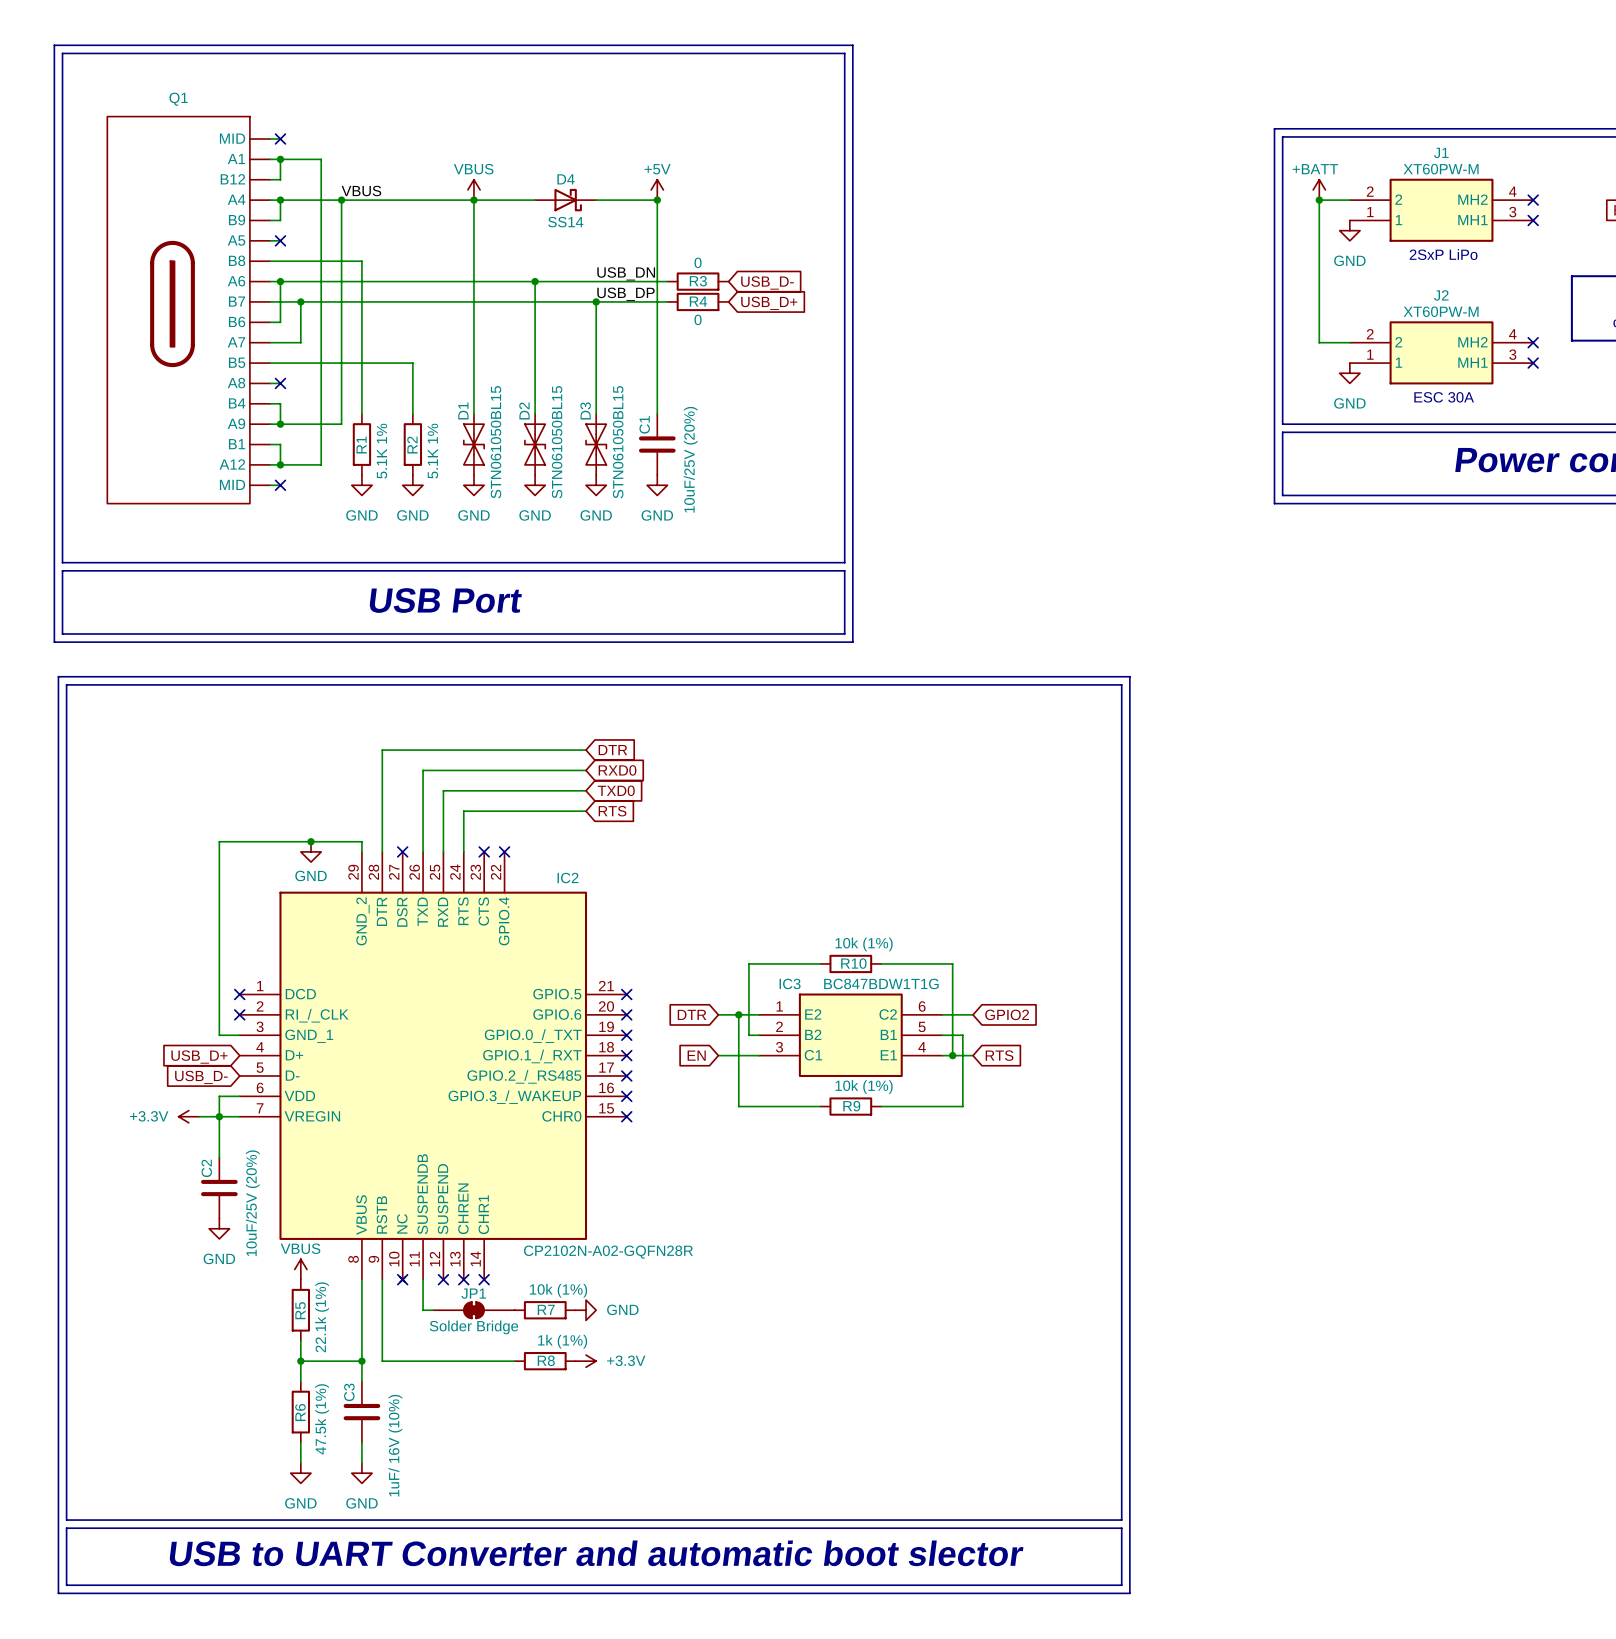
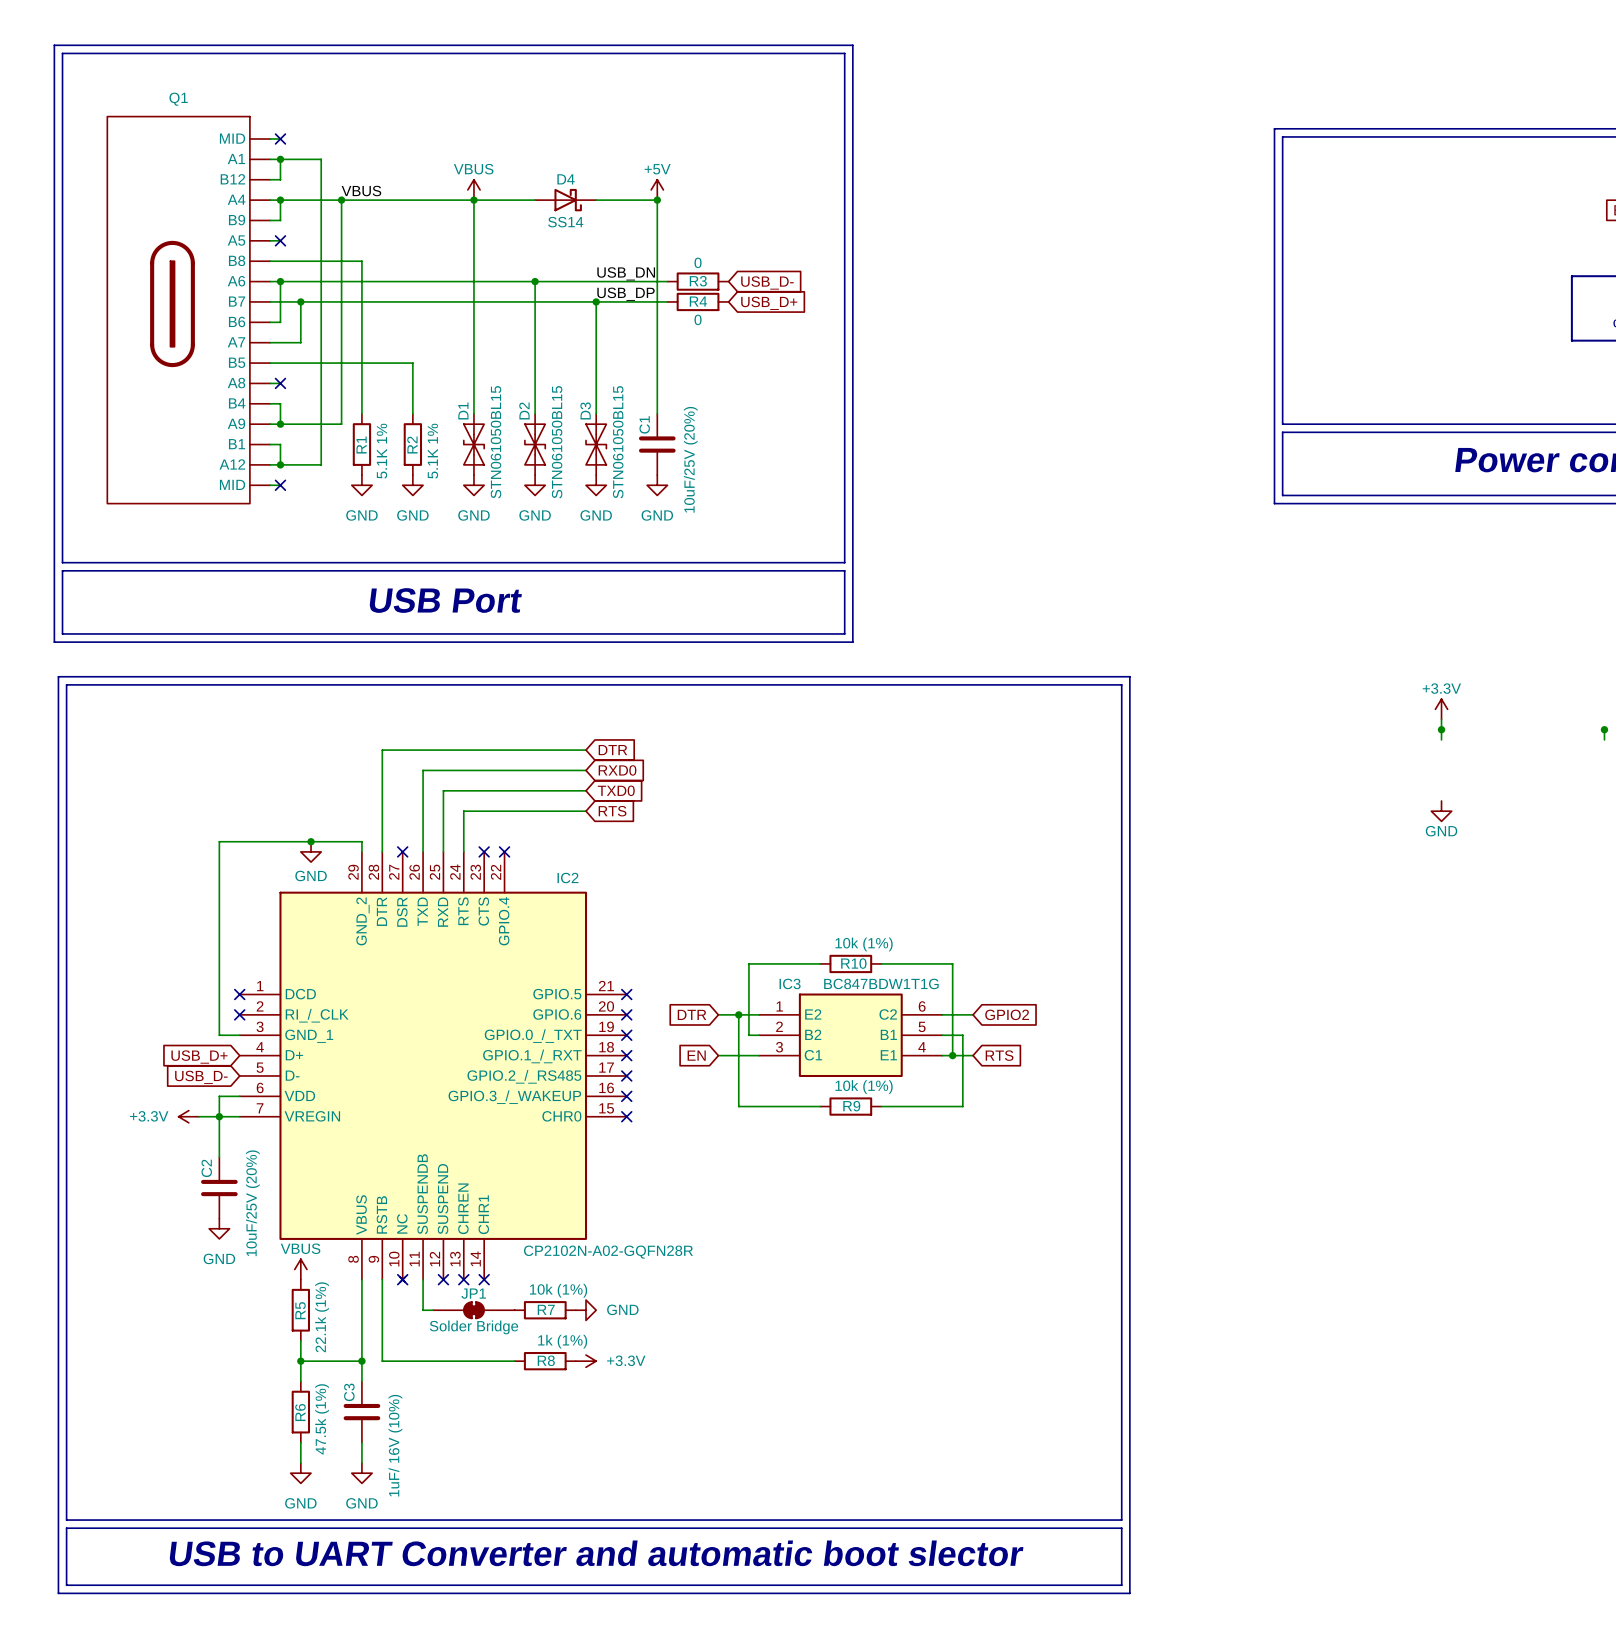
power symbol: +BATT (1319, 189) -> none
junction: (1319, 200) -> none
wire: (1349, 200) (1319, 200) (1319, 342) (1349, 342) -> none
no-connect mark: (1533, 200) -> none
J1: XT60PW-M (1441, 210) -> none
no-connect mark: (1533, 220) -> none
power symbol: GND (1349, 230) -> none
text: 2SxP LiPo (1443, 254) -> none
no-connect mark: (1533, 342) -> none
J2: XT60PW-M (1441, 352) -> none
no-connect mark: (1533, 363) -> none
power symbol: GND (1349, 373) -> none
text: ESC 30A (1444, 397) -> none
power symbol: none -> +3.3V (1441, 709)
wire: none -> (1441, 719) (1441, 739)
junction: none -> (1441, 729)
wire: none -> (1604, 729) (1604, 739)
junction: none -> (1604, 729)
power symbol: none -> GND (1441, 811)

